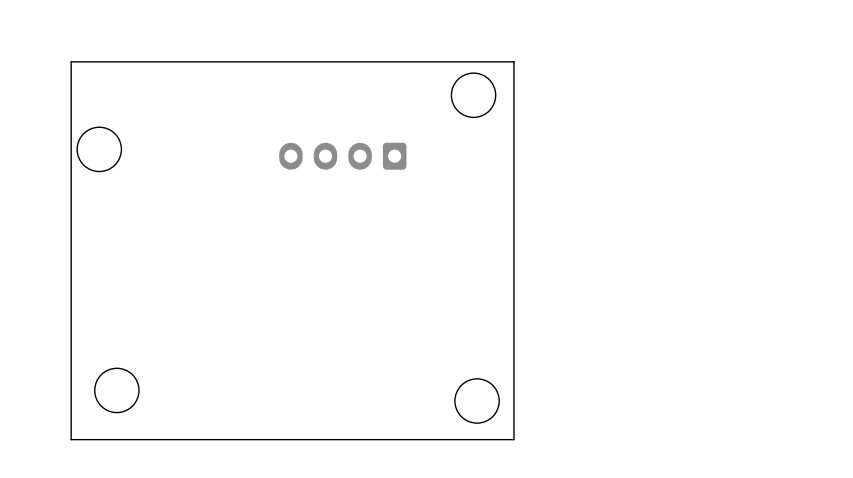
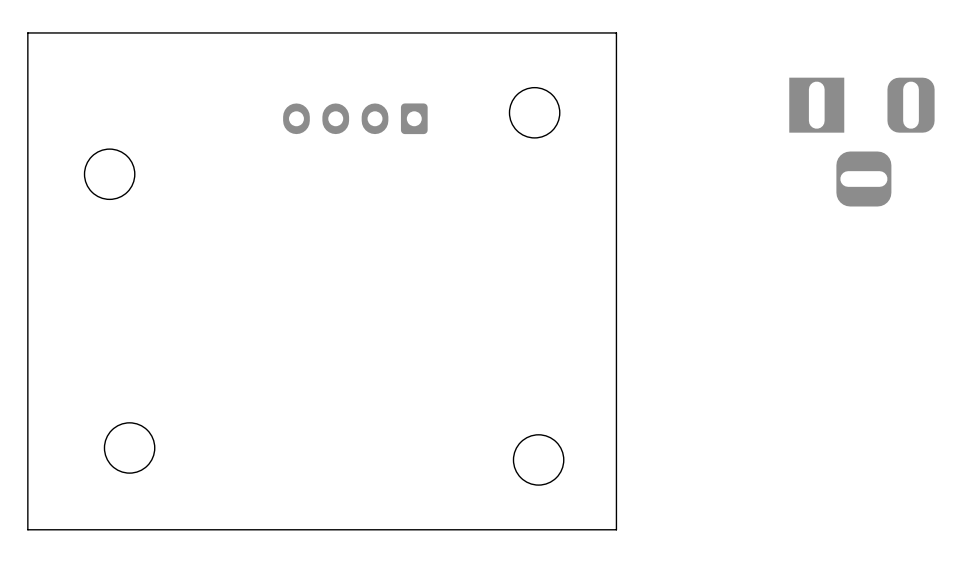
board edge: (513, 61) (71, 61) (71, 439) (513, 439) (513, 61) -> (616, 32) (616, 529) (27, 529) (27, 32) (616, 32)
part: none -> (861, 142)
part position: (342, 156) -> (355, 118)

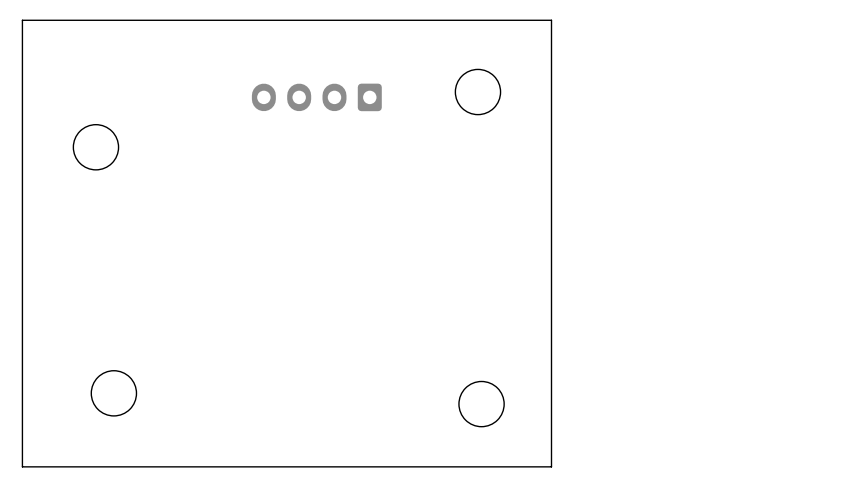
part: (861, 142) -> none

